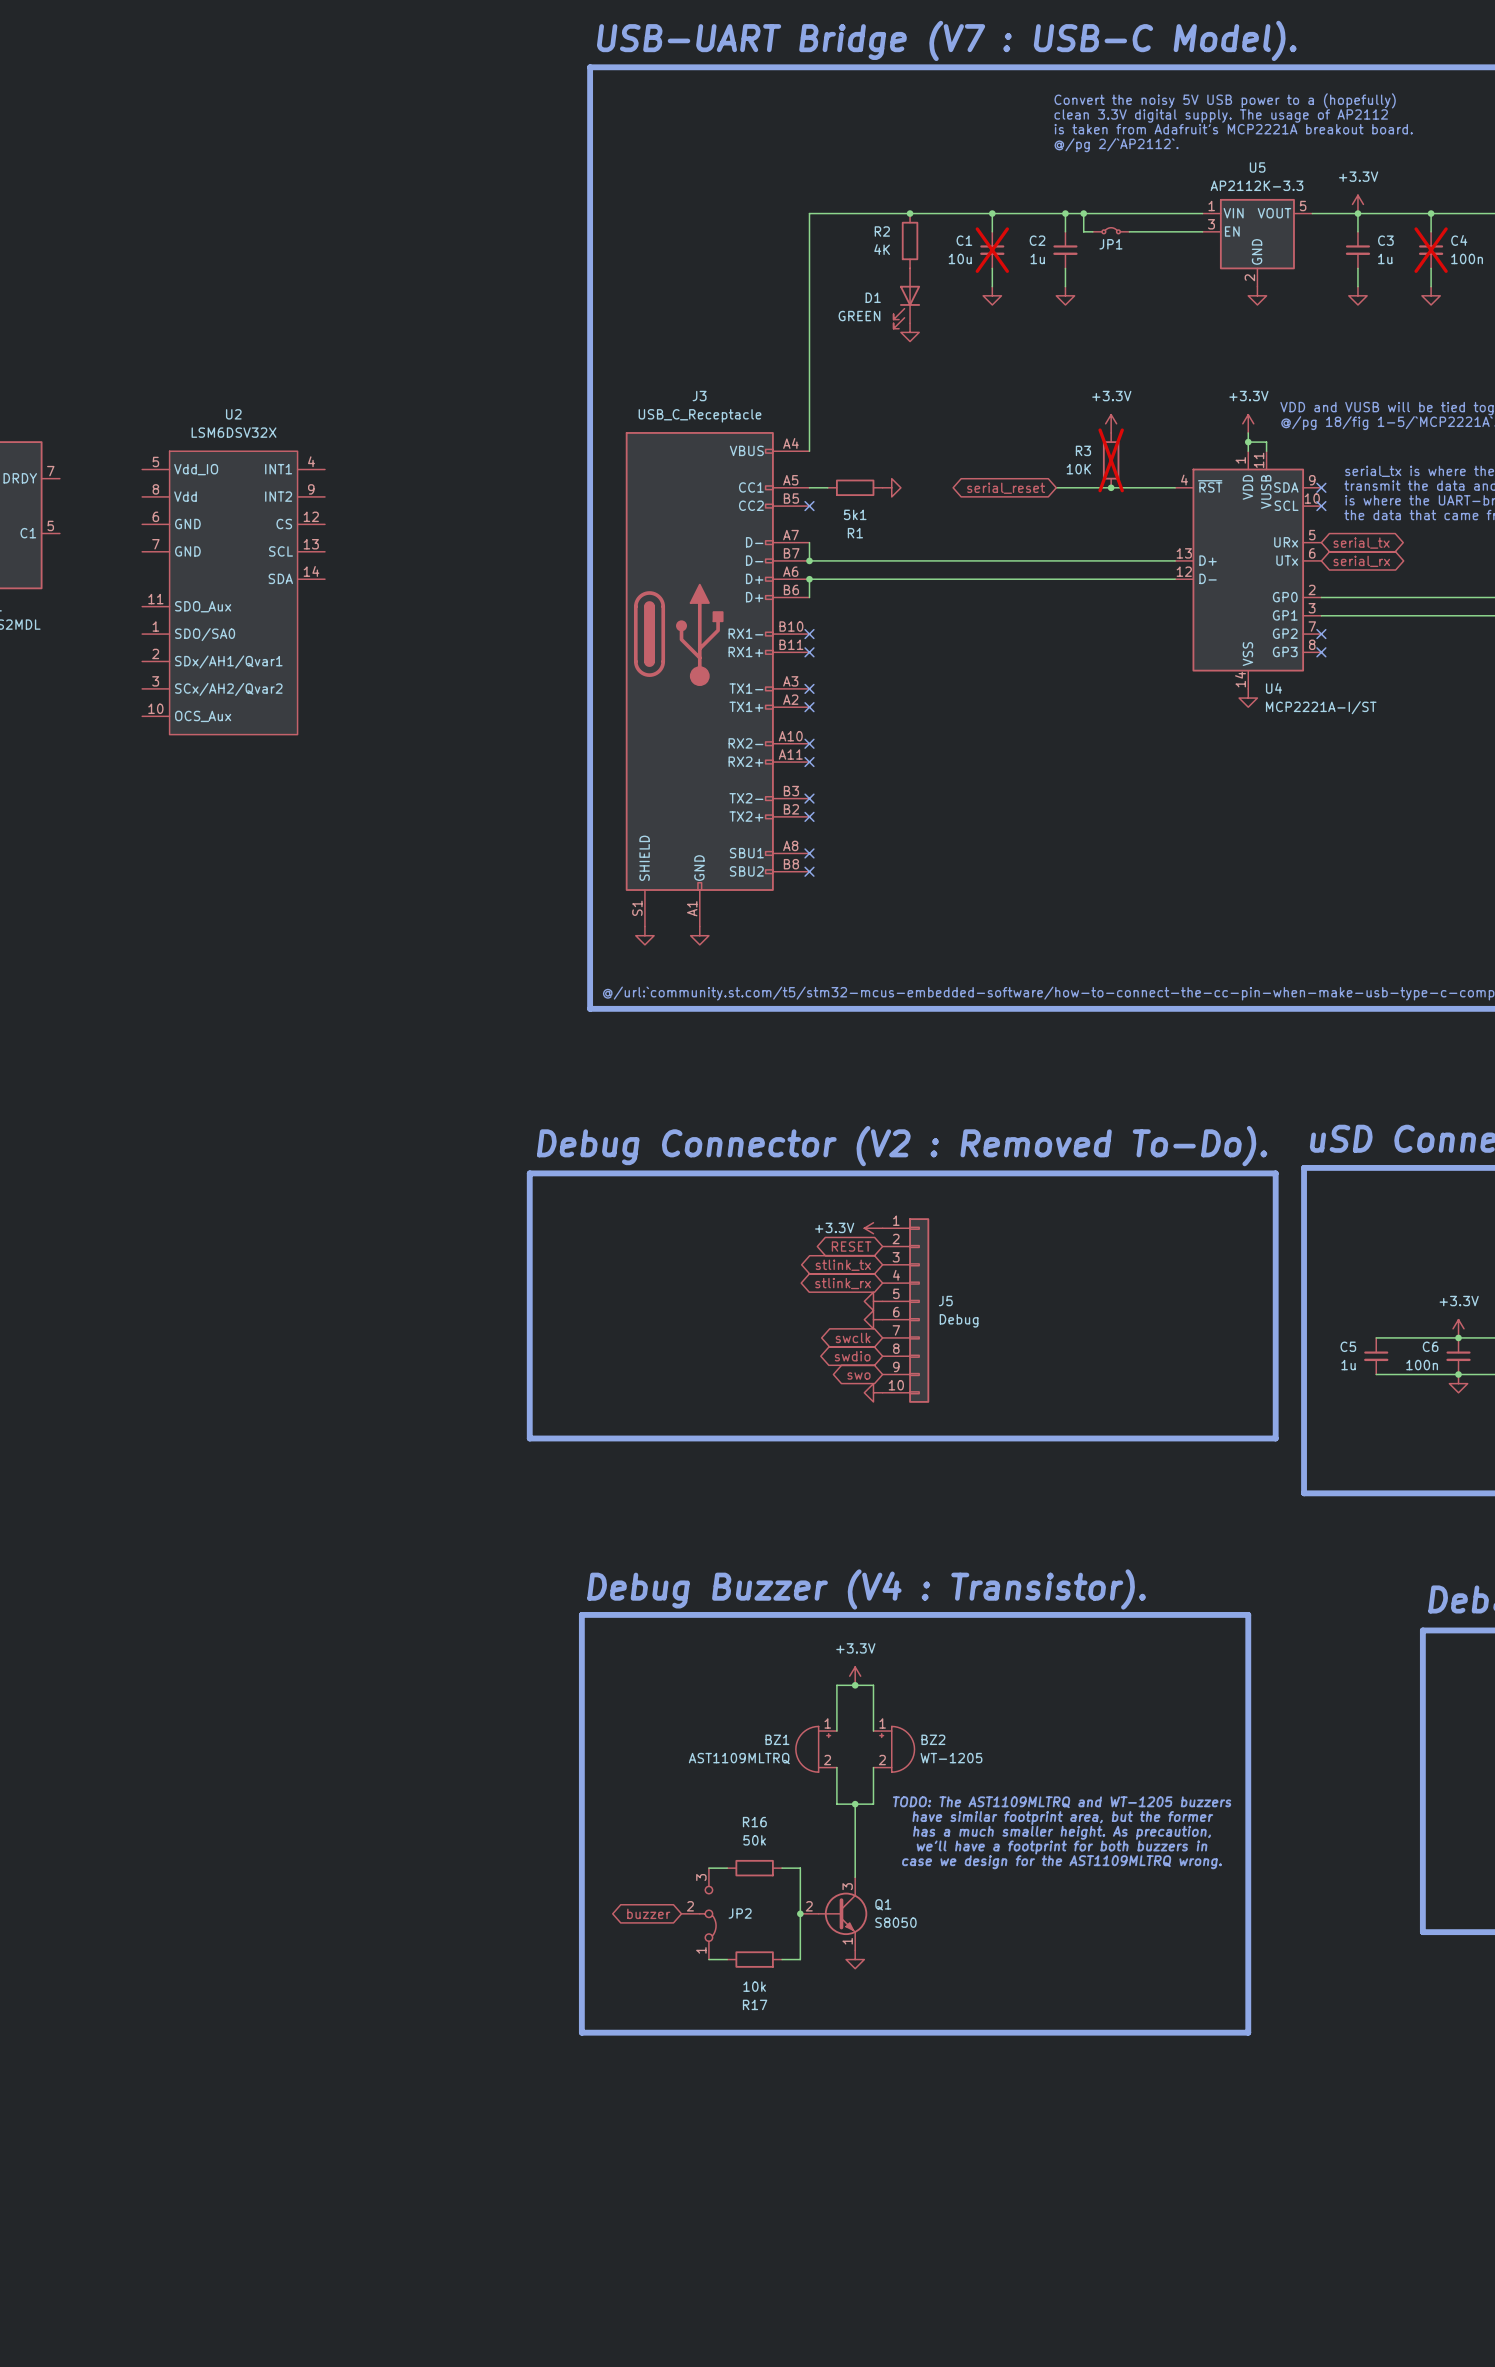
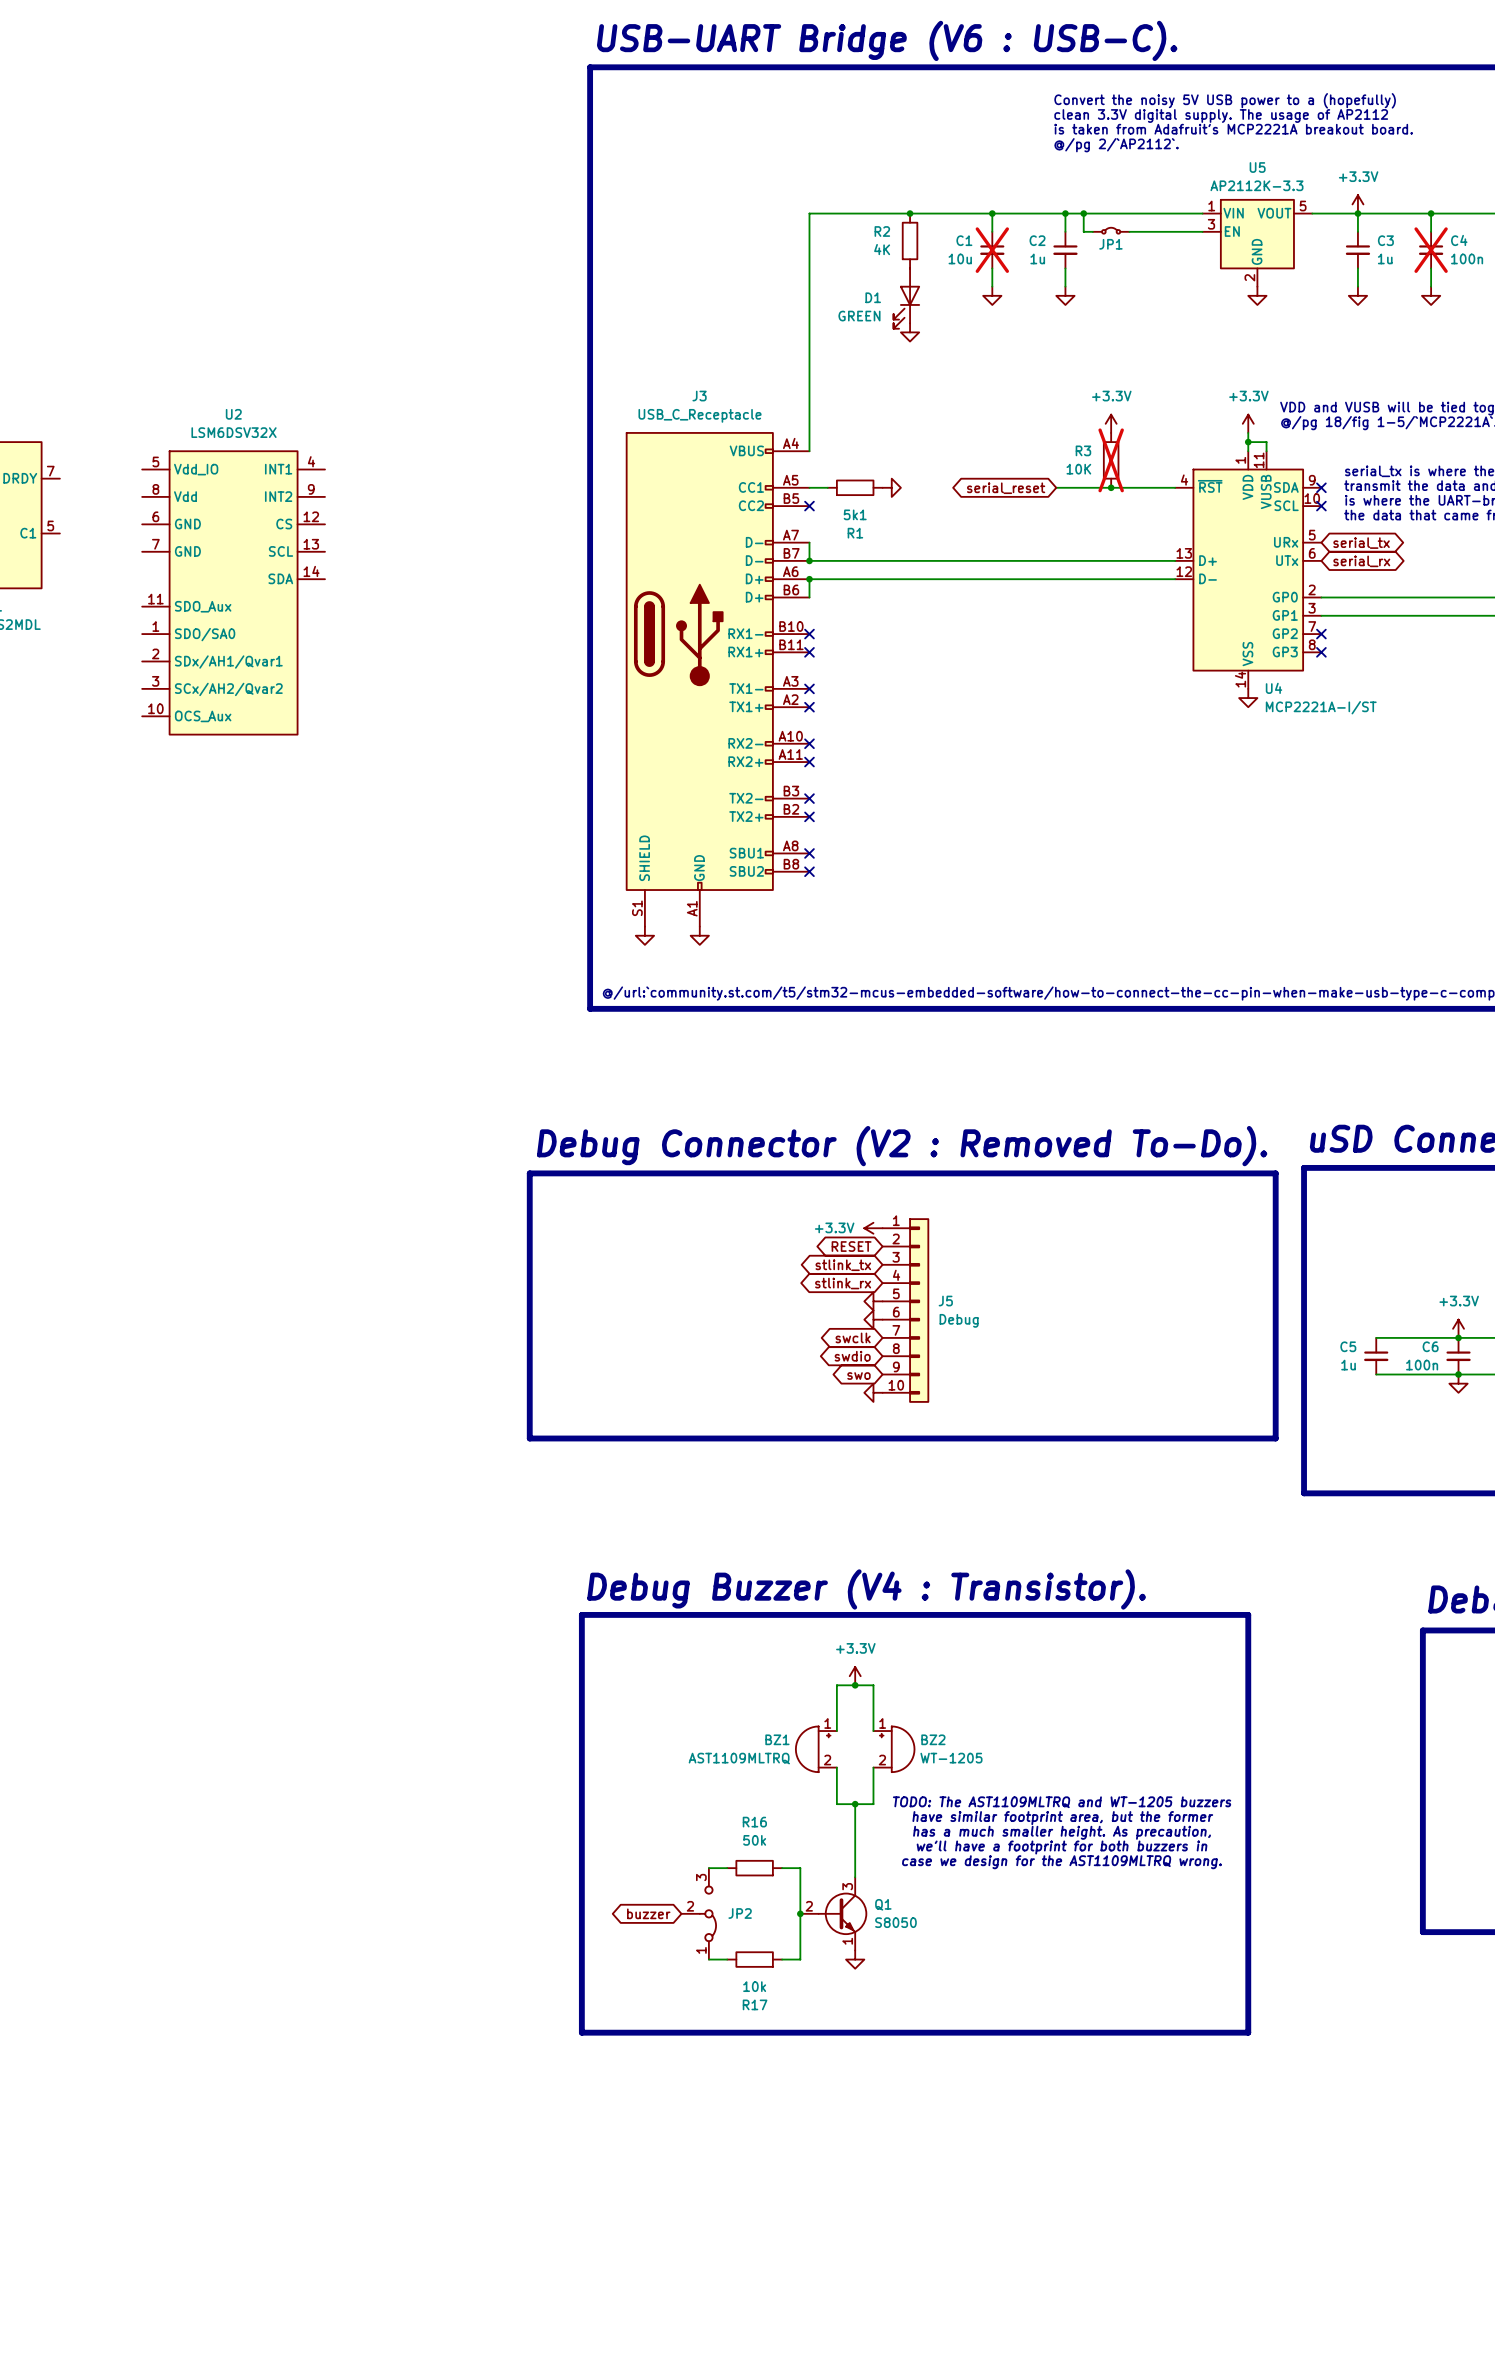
text: USB-UART Bridge (V7 : USB-C Model). (946, 40) -> USB-UART Bridge (V6 : USB-C). (887, 40)

